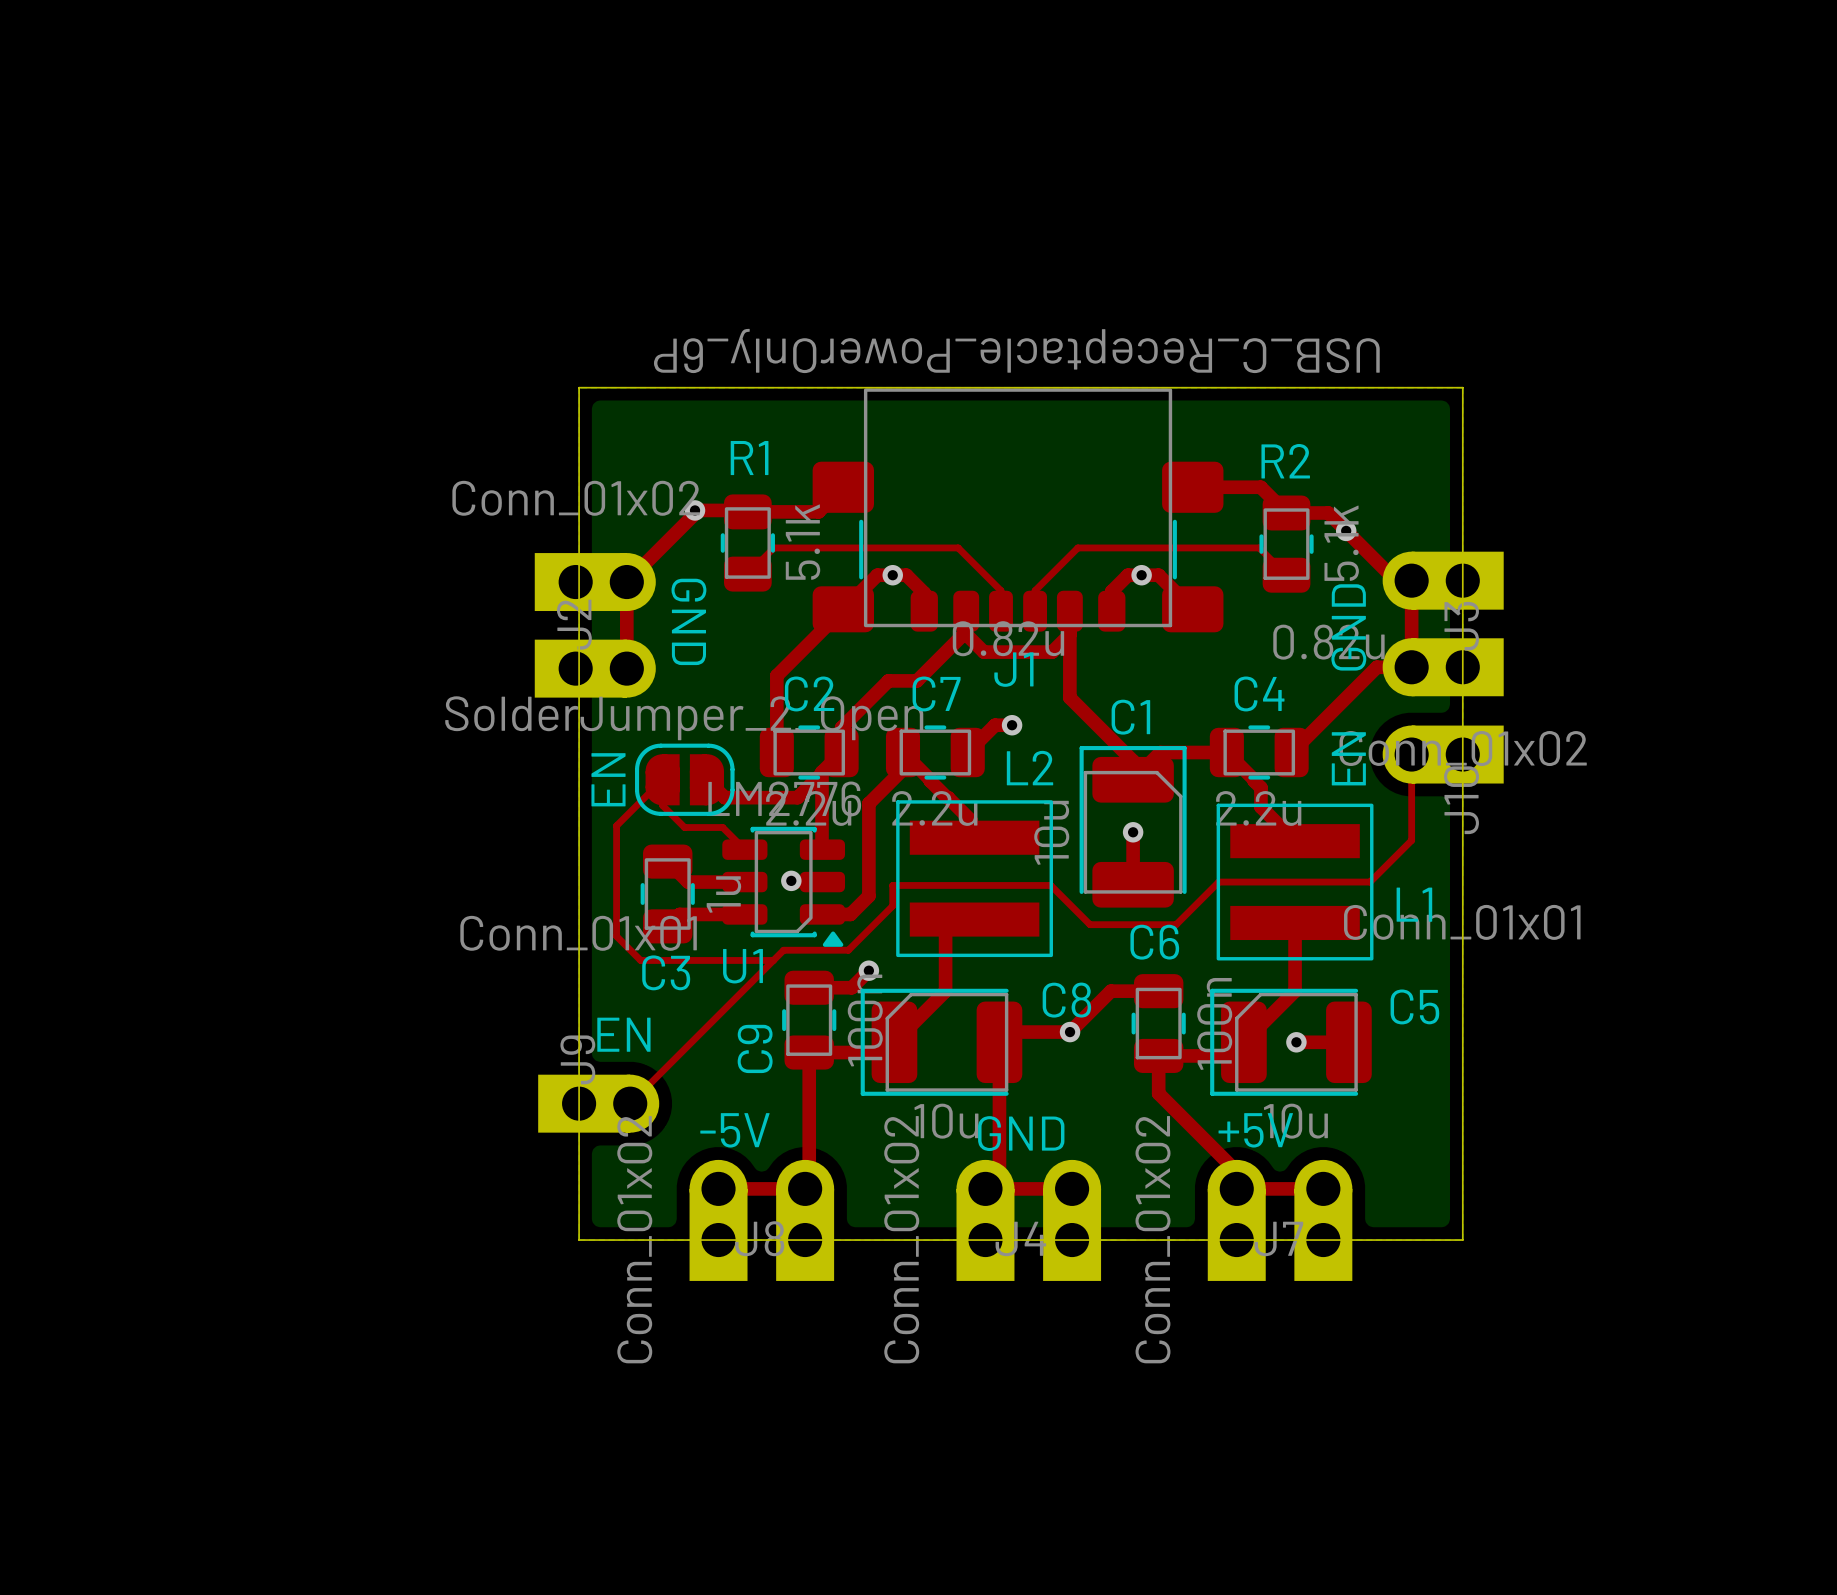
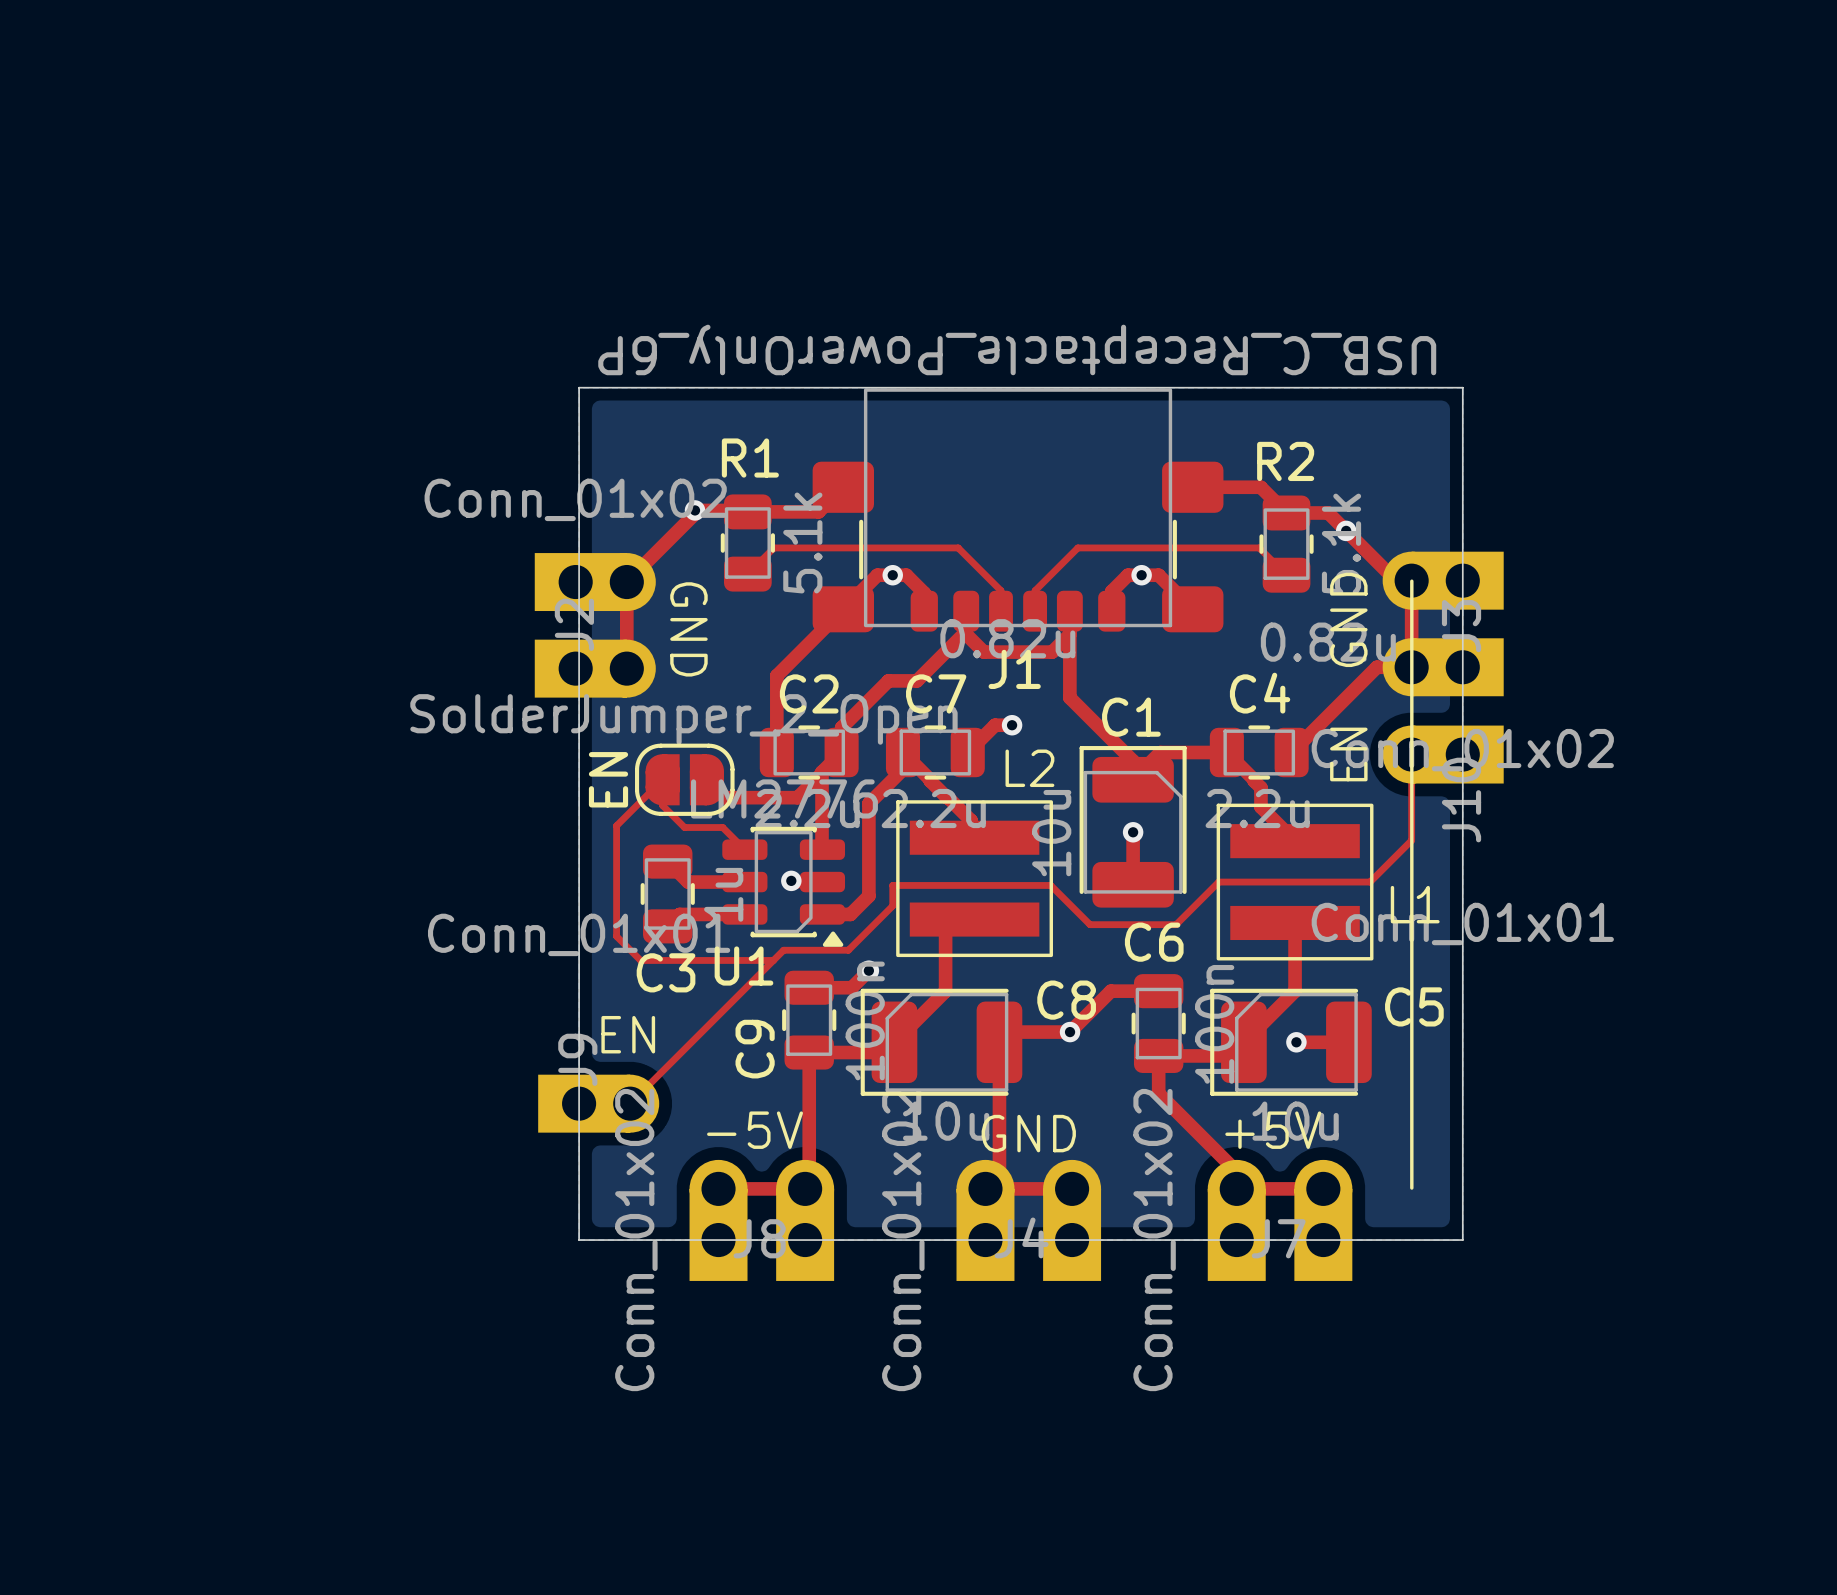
line: none -> (1411, 581) (1411, 1188)

